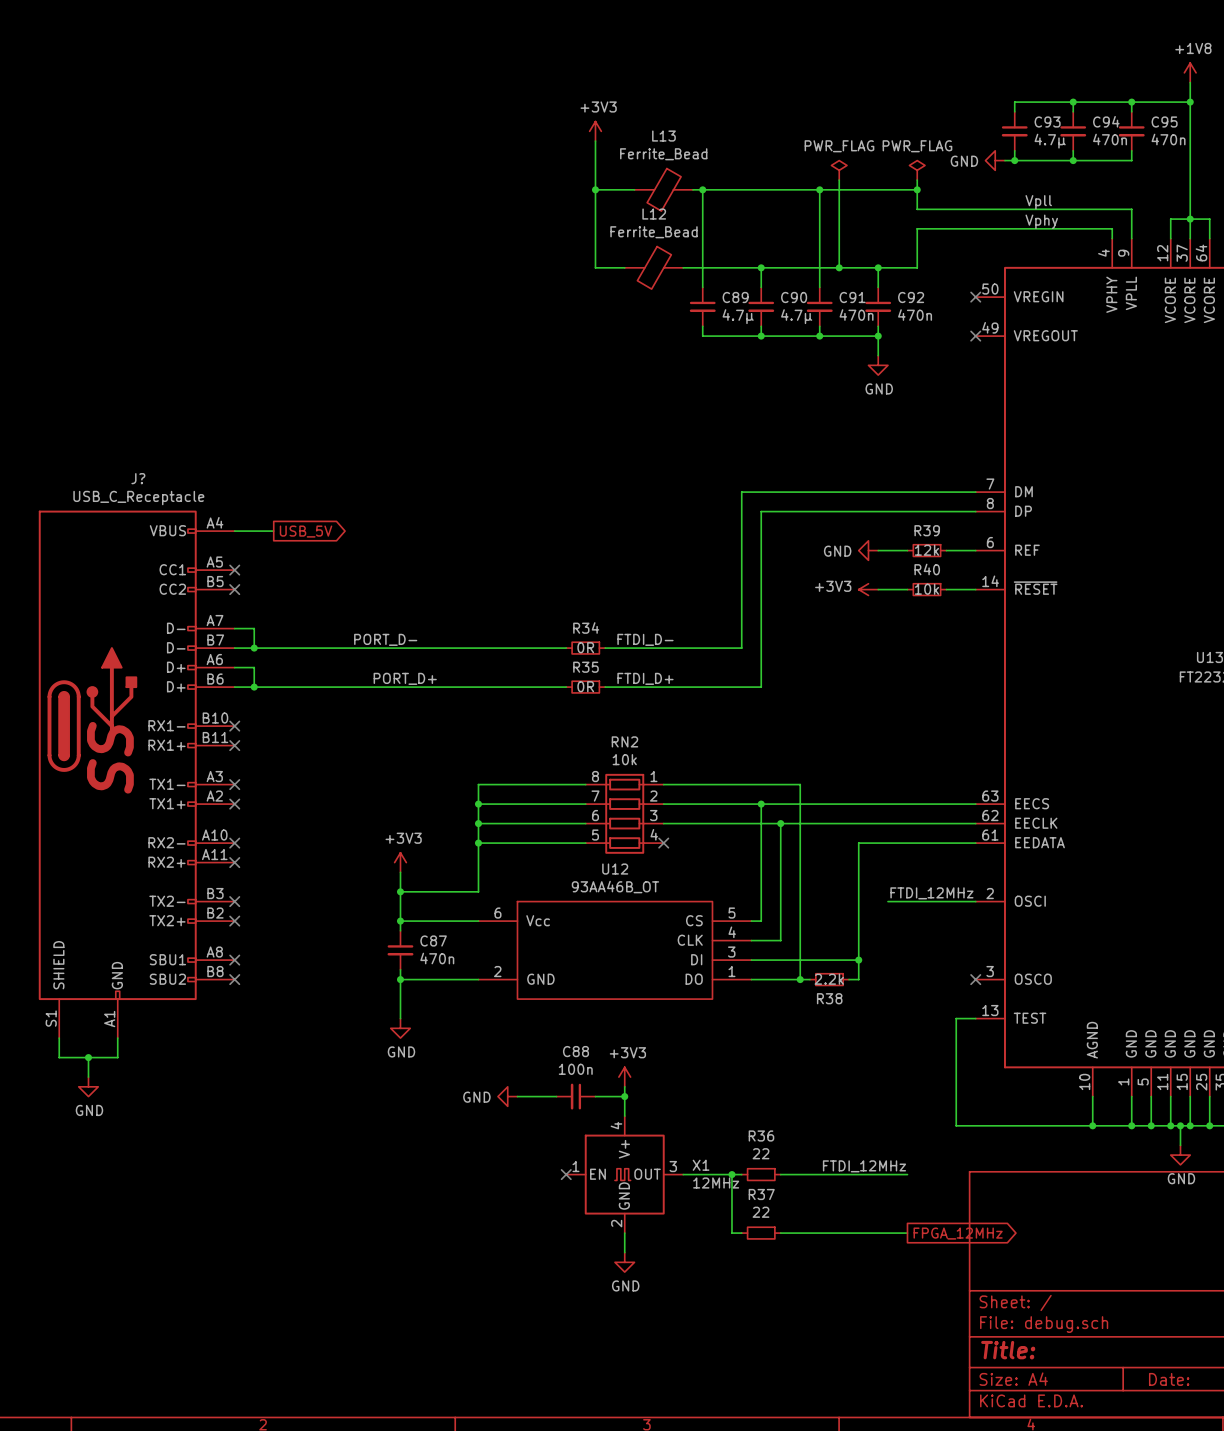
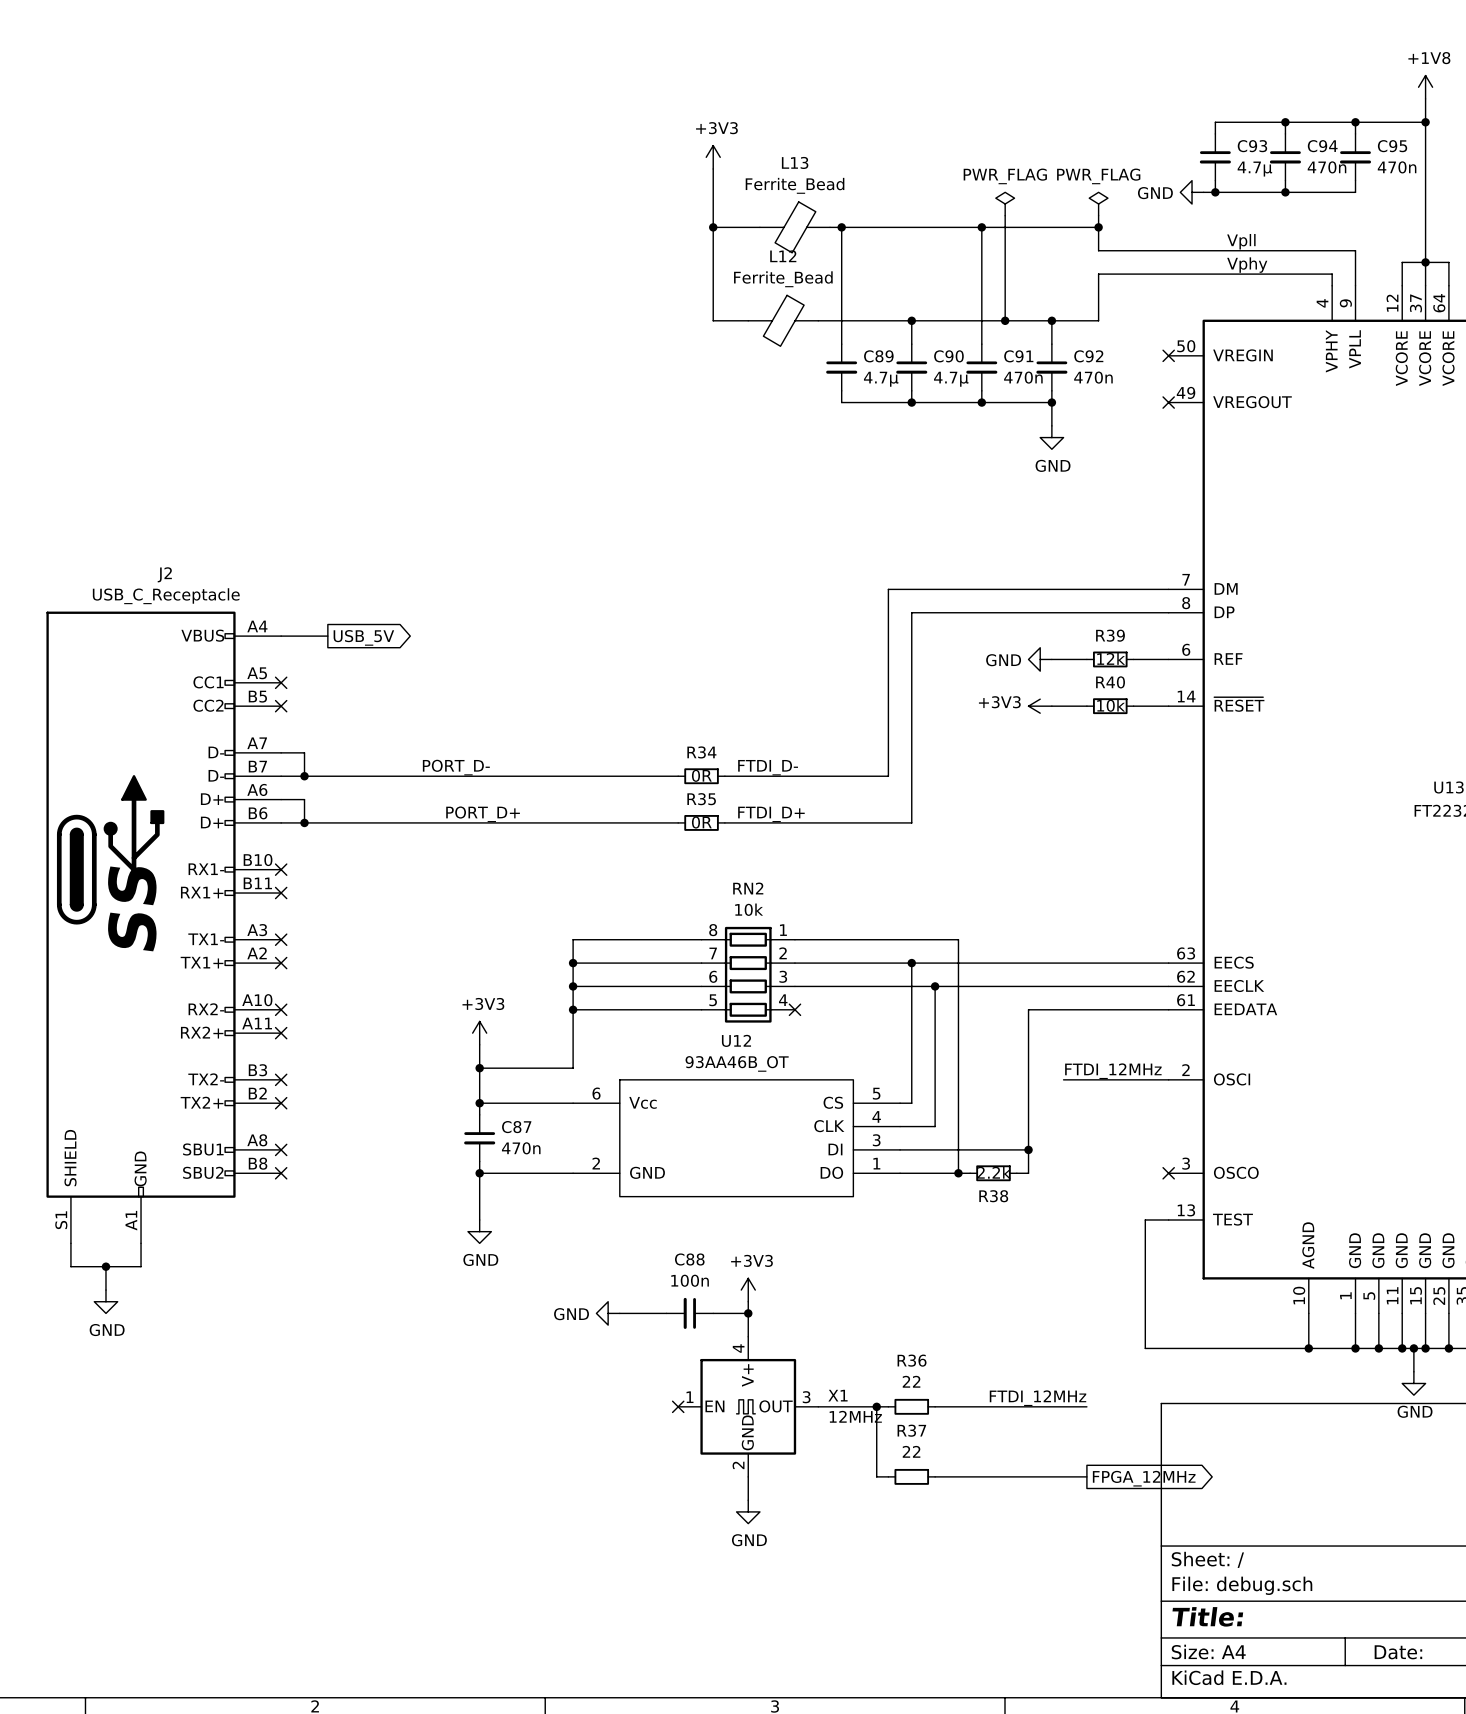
J? name: J? (138, 478) -> J2 (164, 574)

